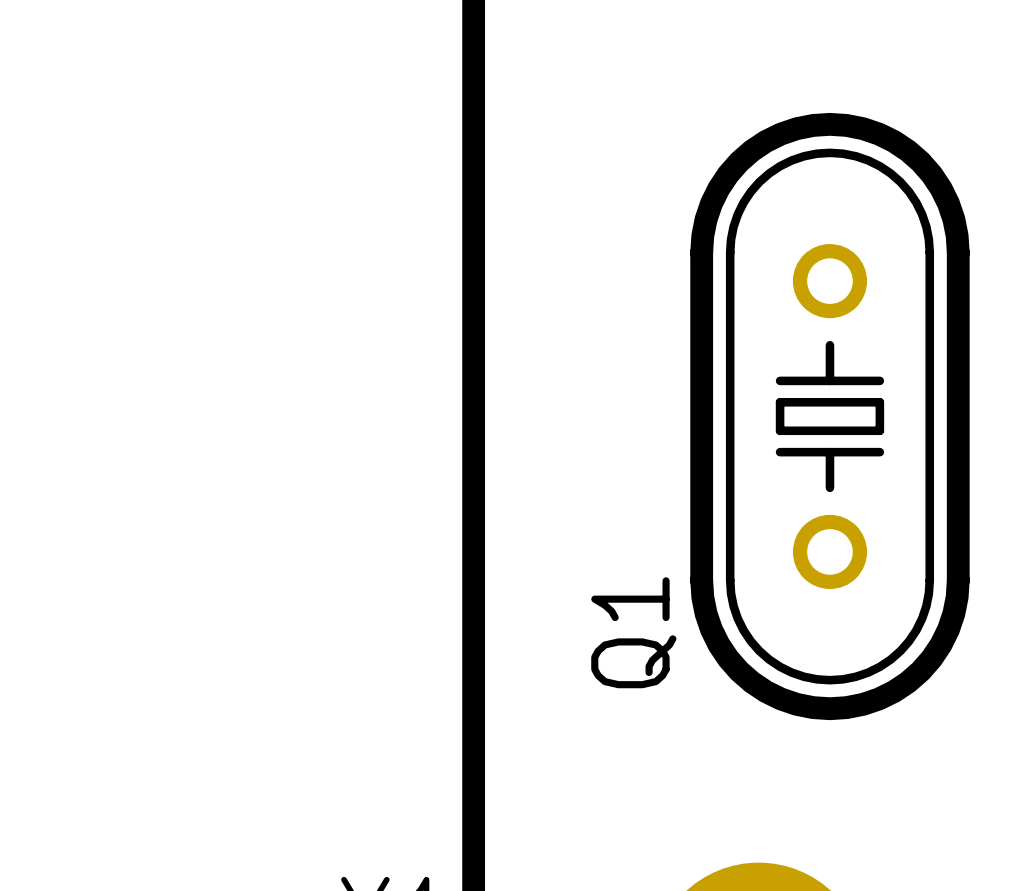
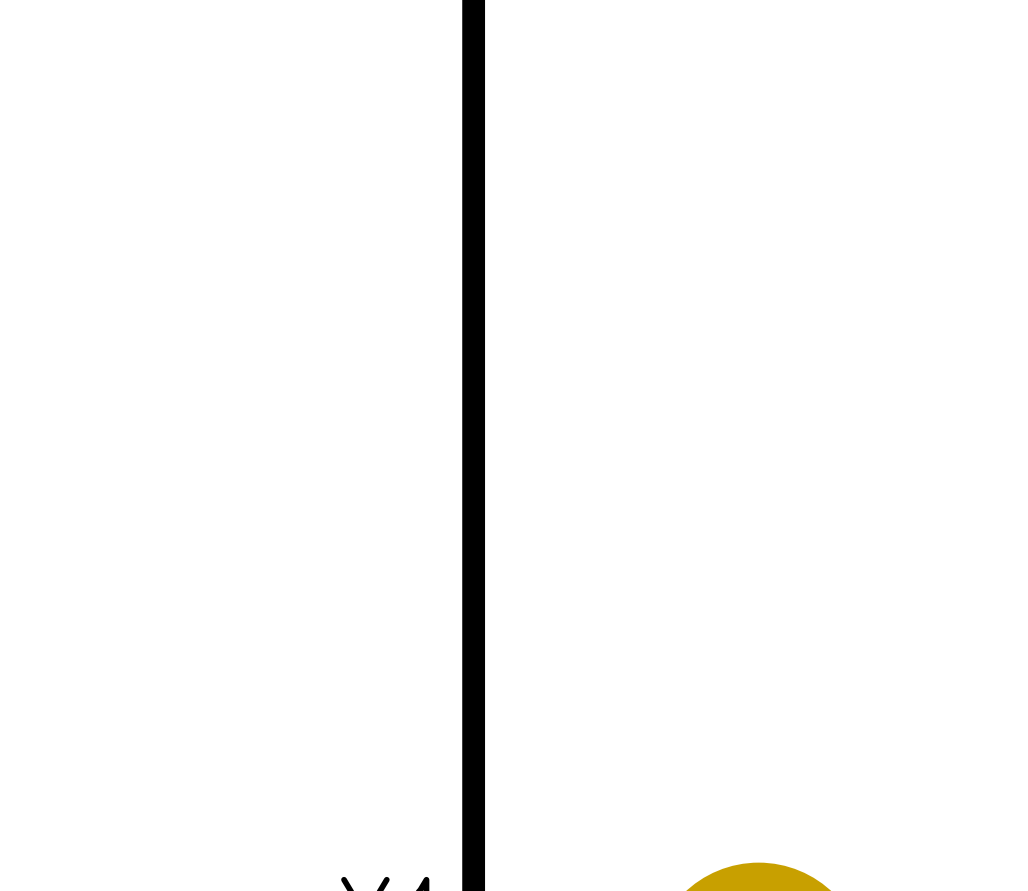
Q1: (829, 416) -> none

